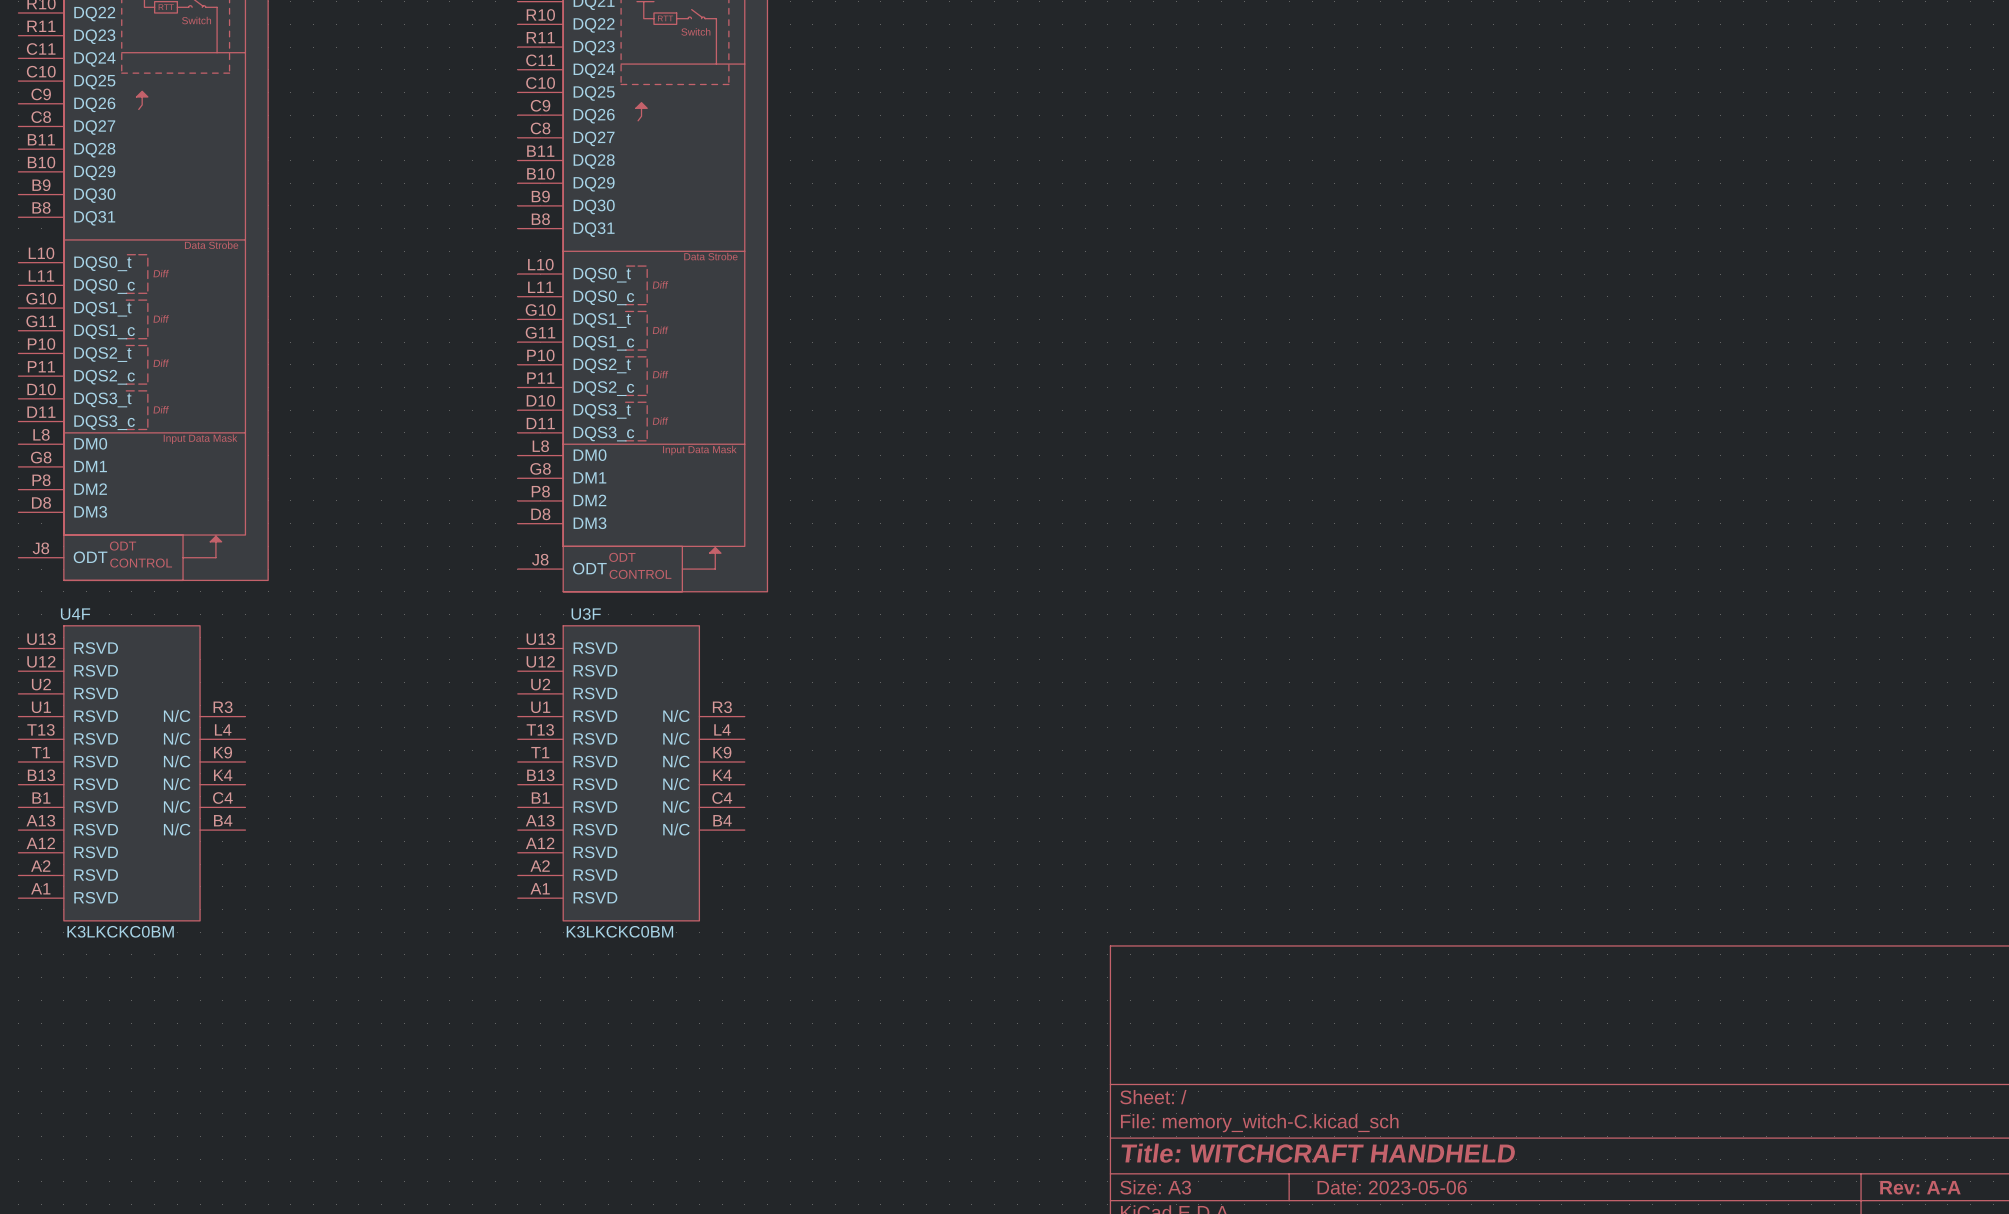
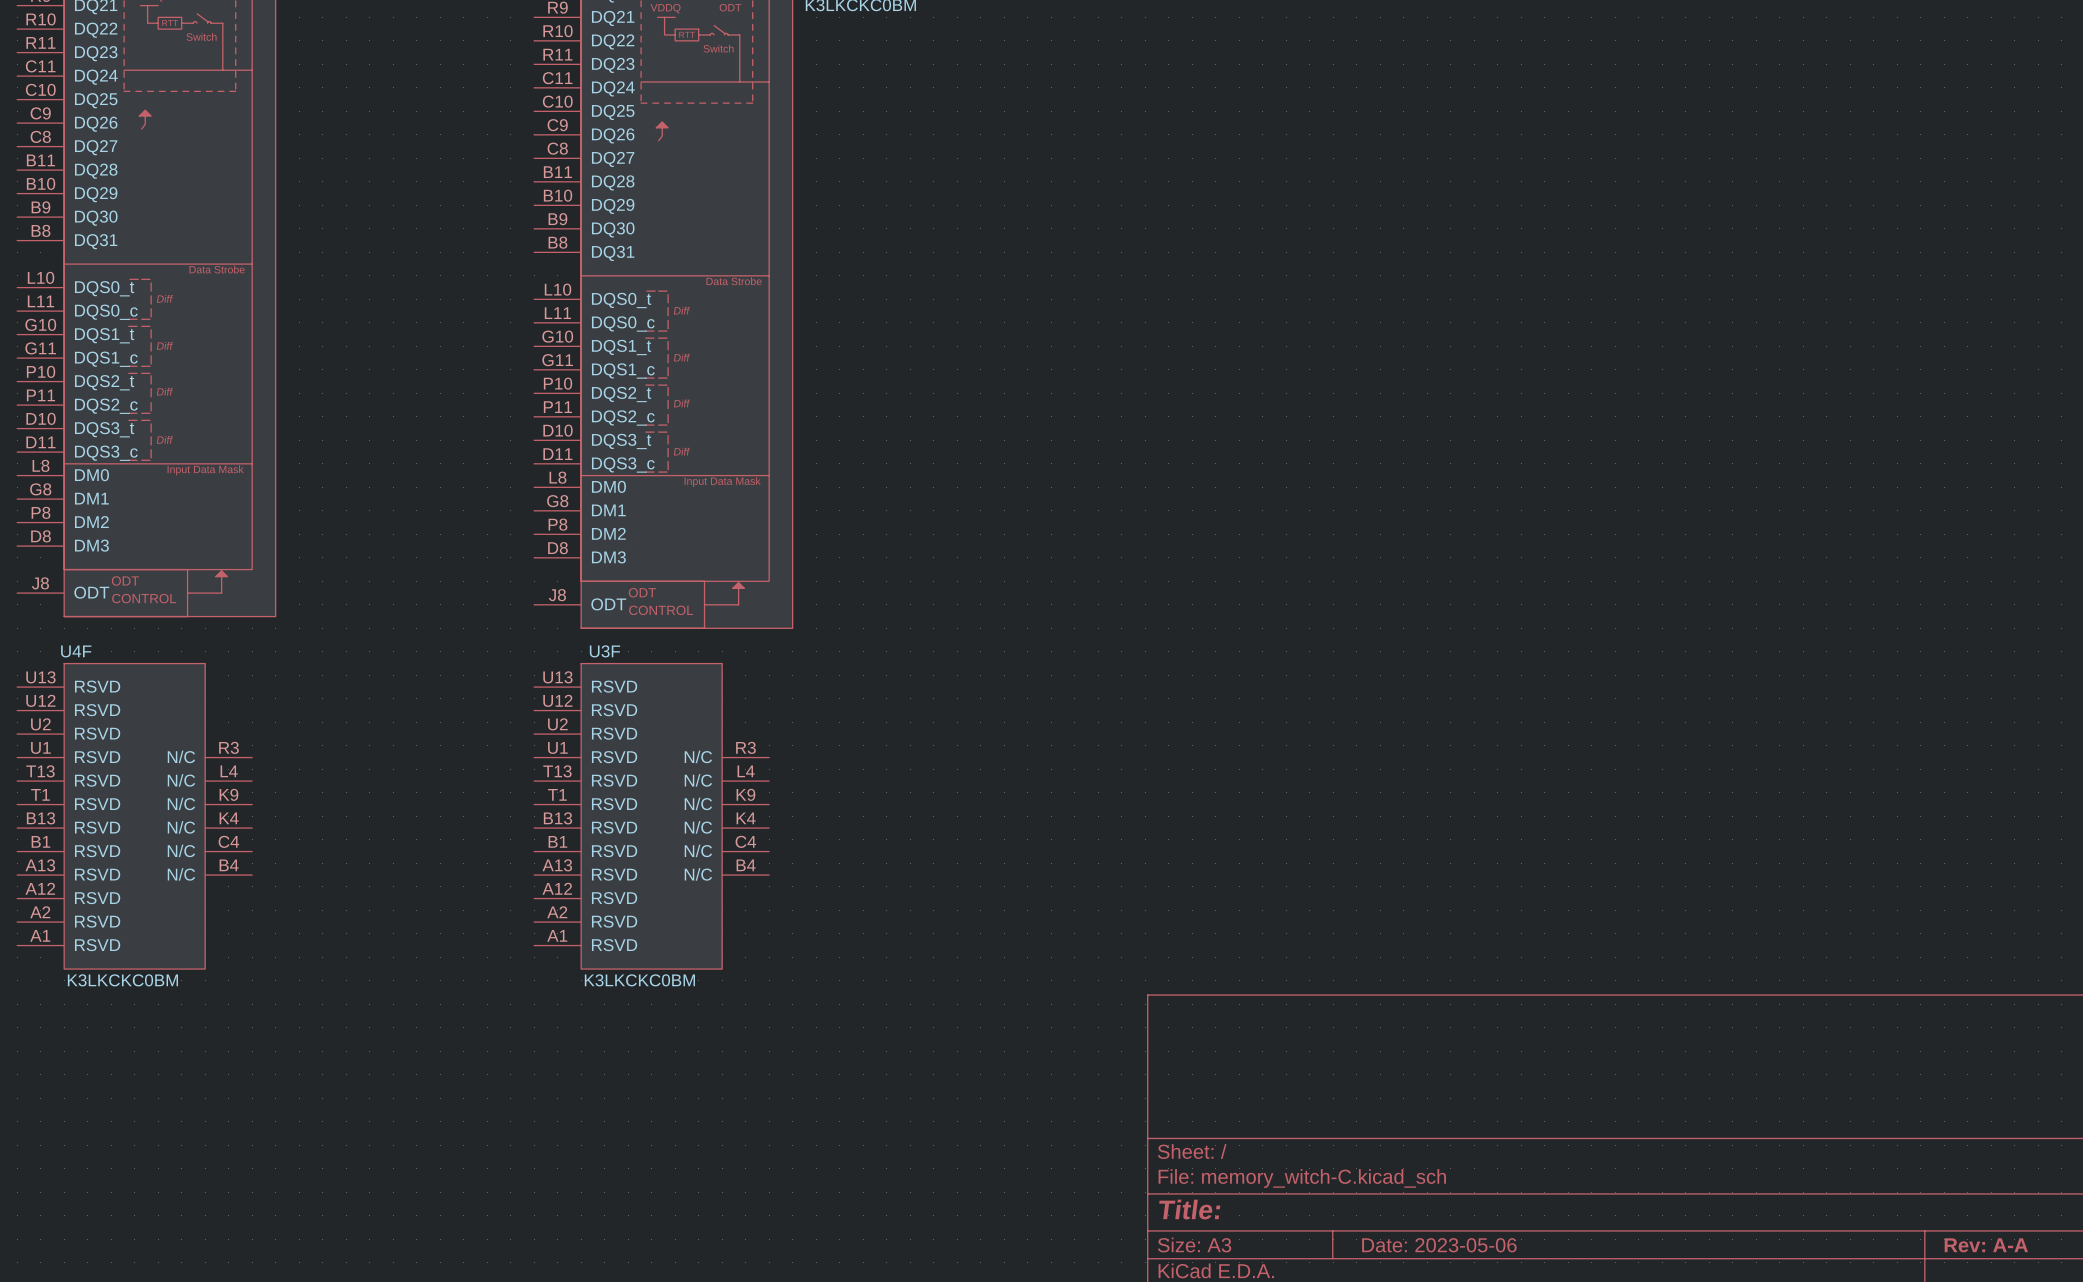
title block: Title: WITCHCRAFT HANDHELD (1318, 1153) -> Title: (1189, 1209)

